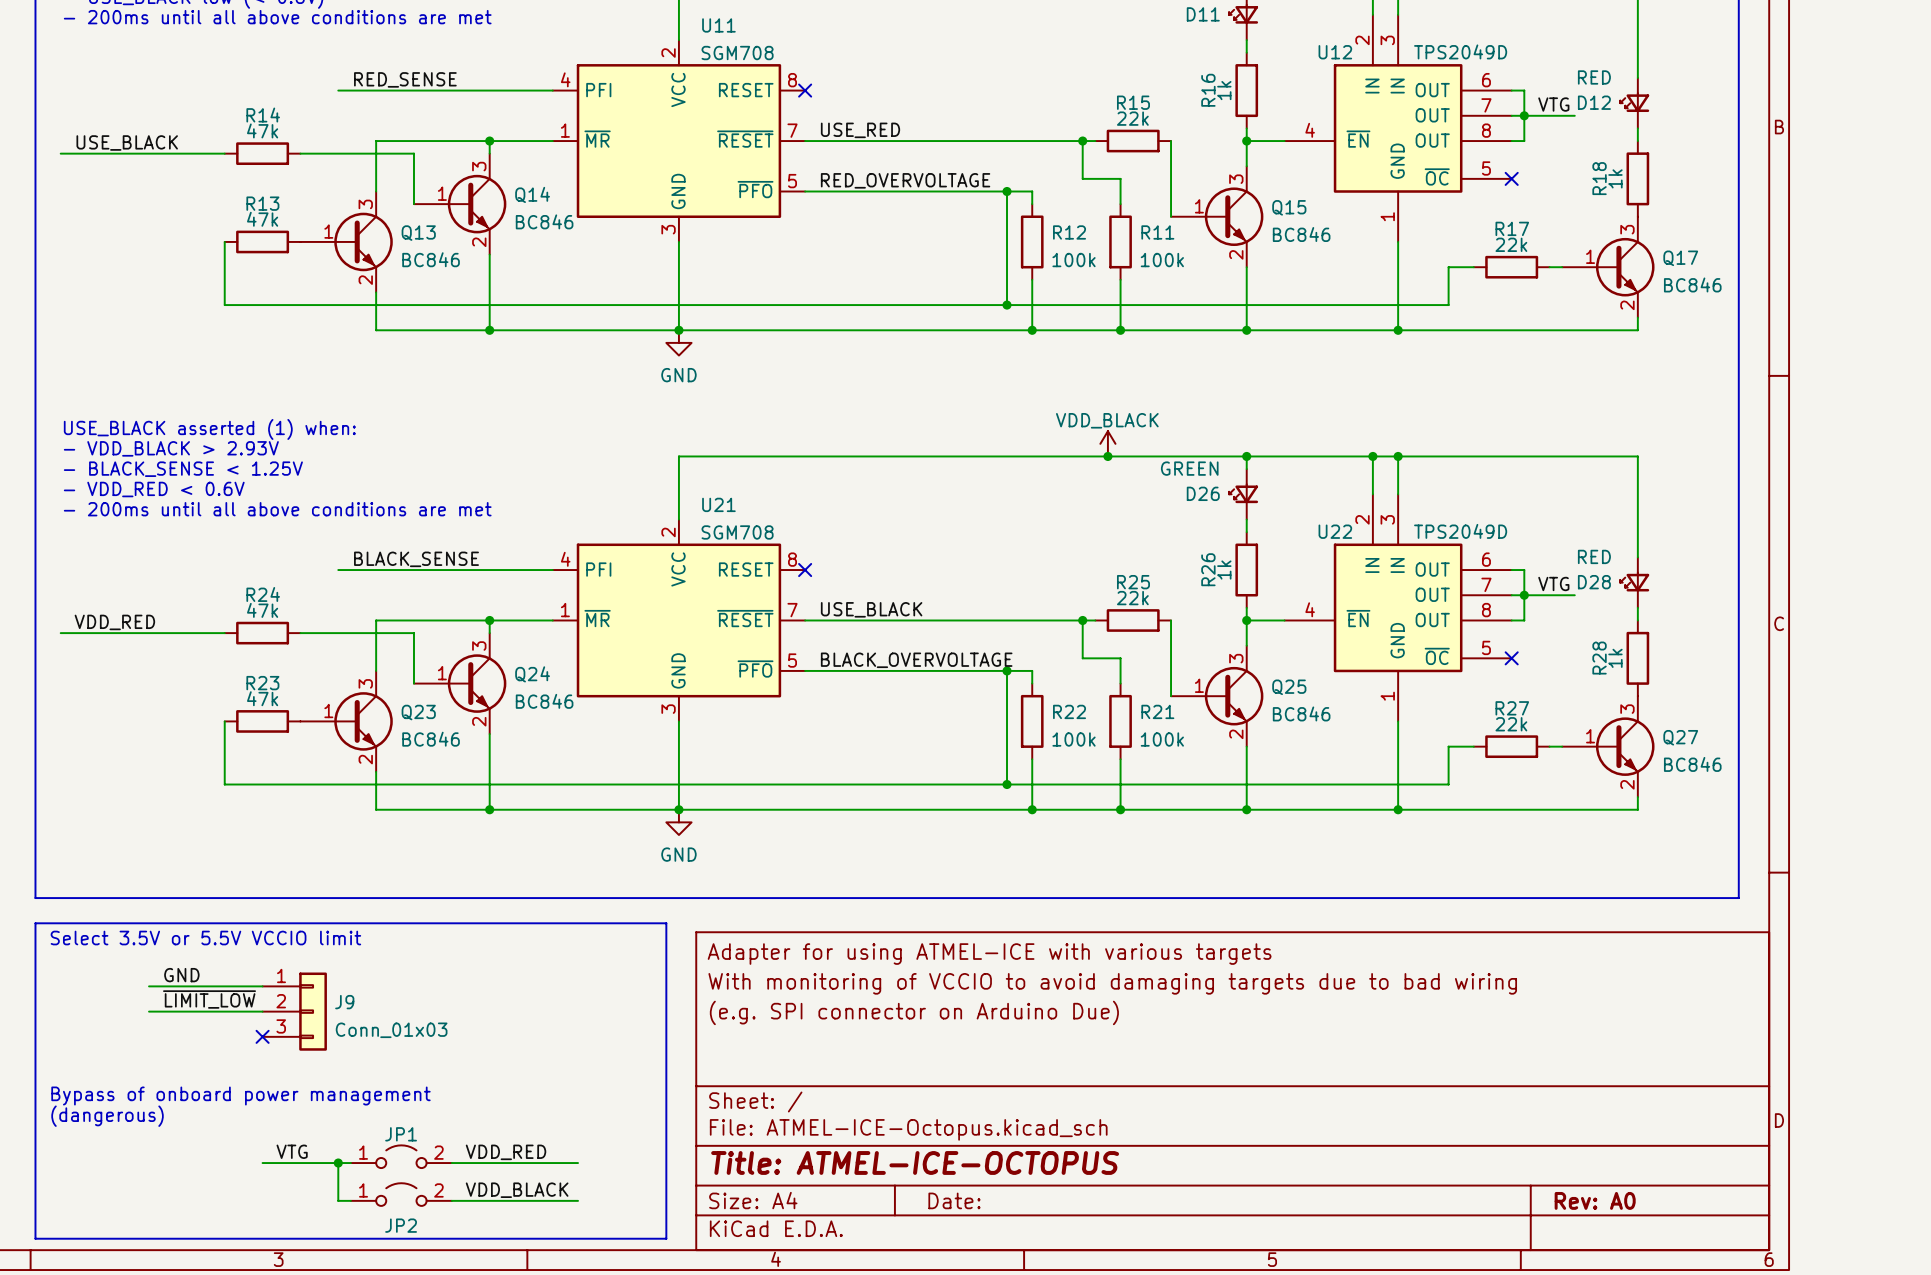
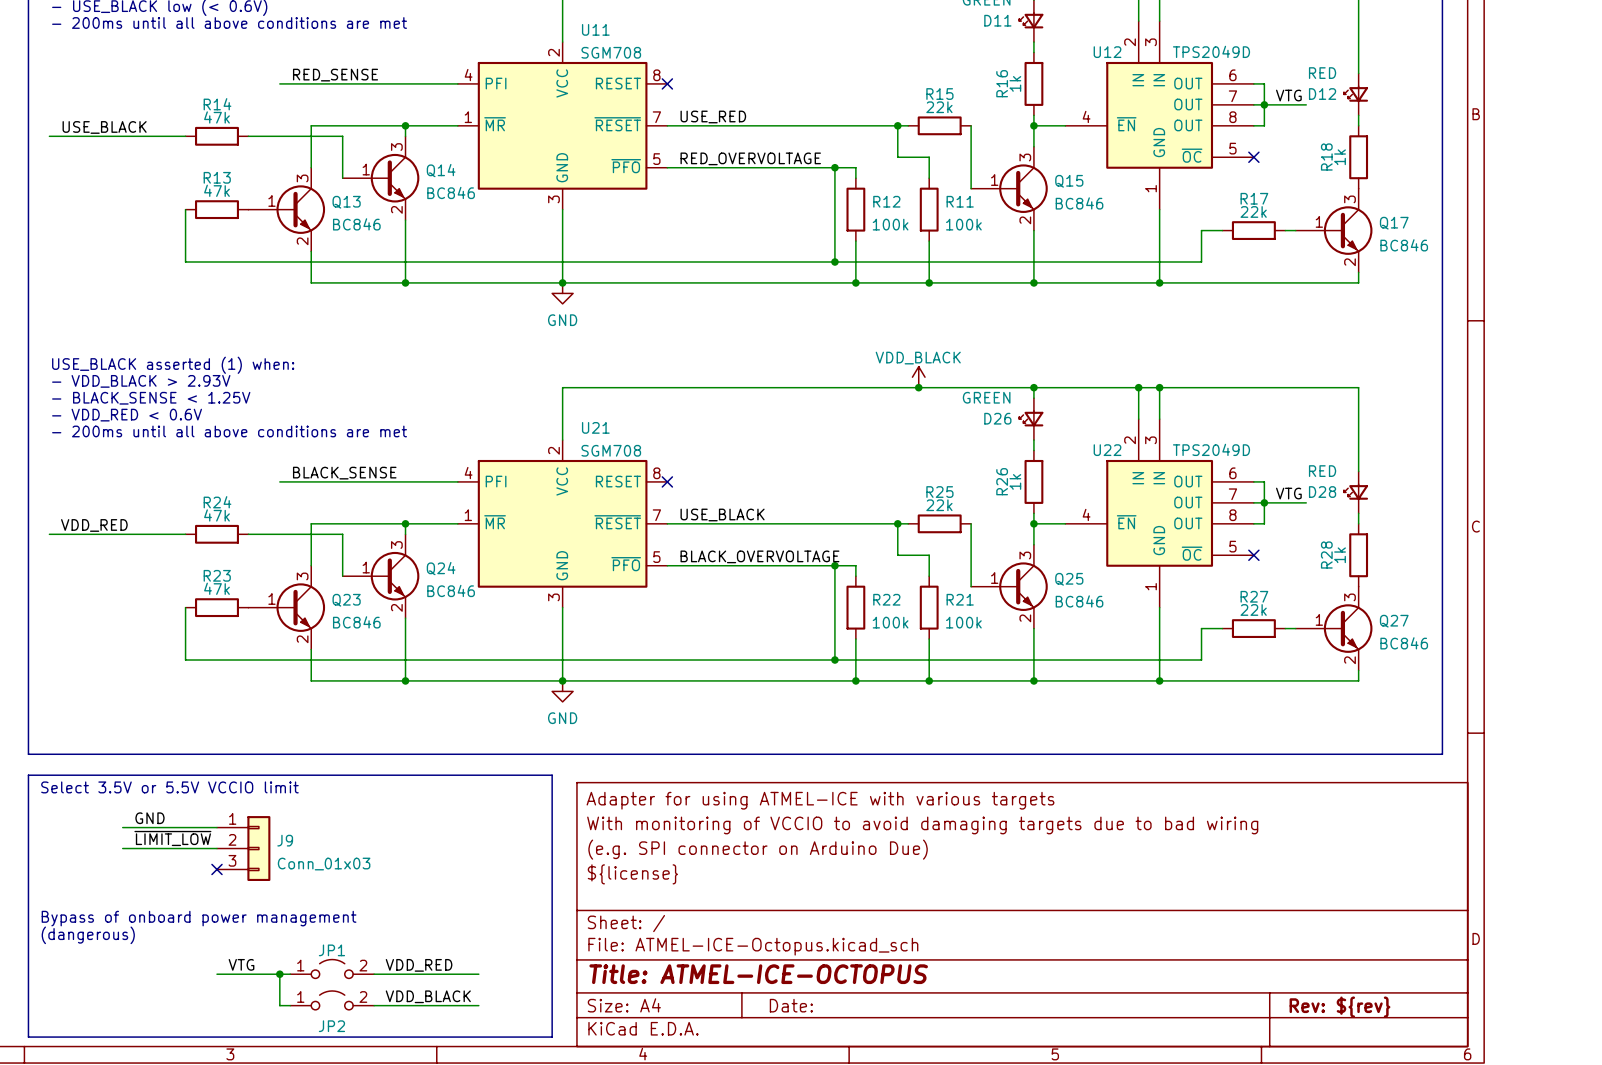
title block: none -> ${license} (632, 874)
title block: Rev: A0 (1595, 1200) -> Rev: ${rev} (1339, 1007)

